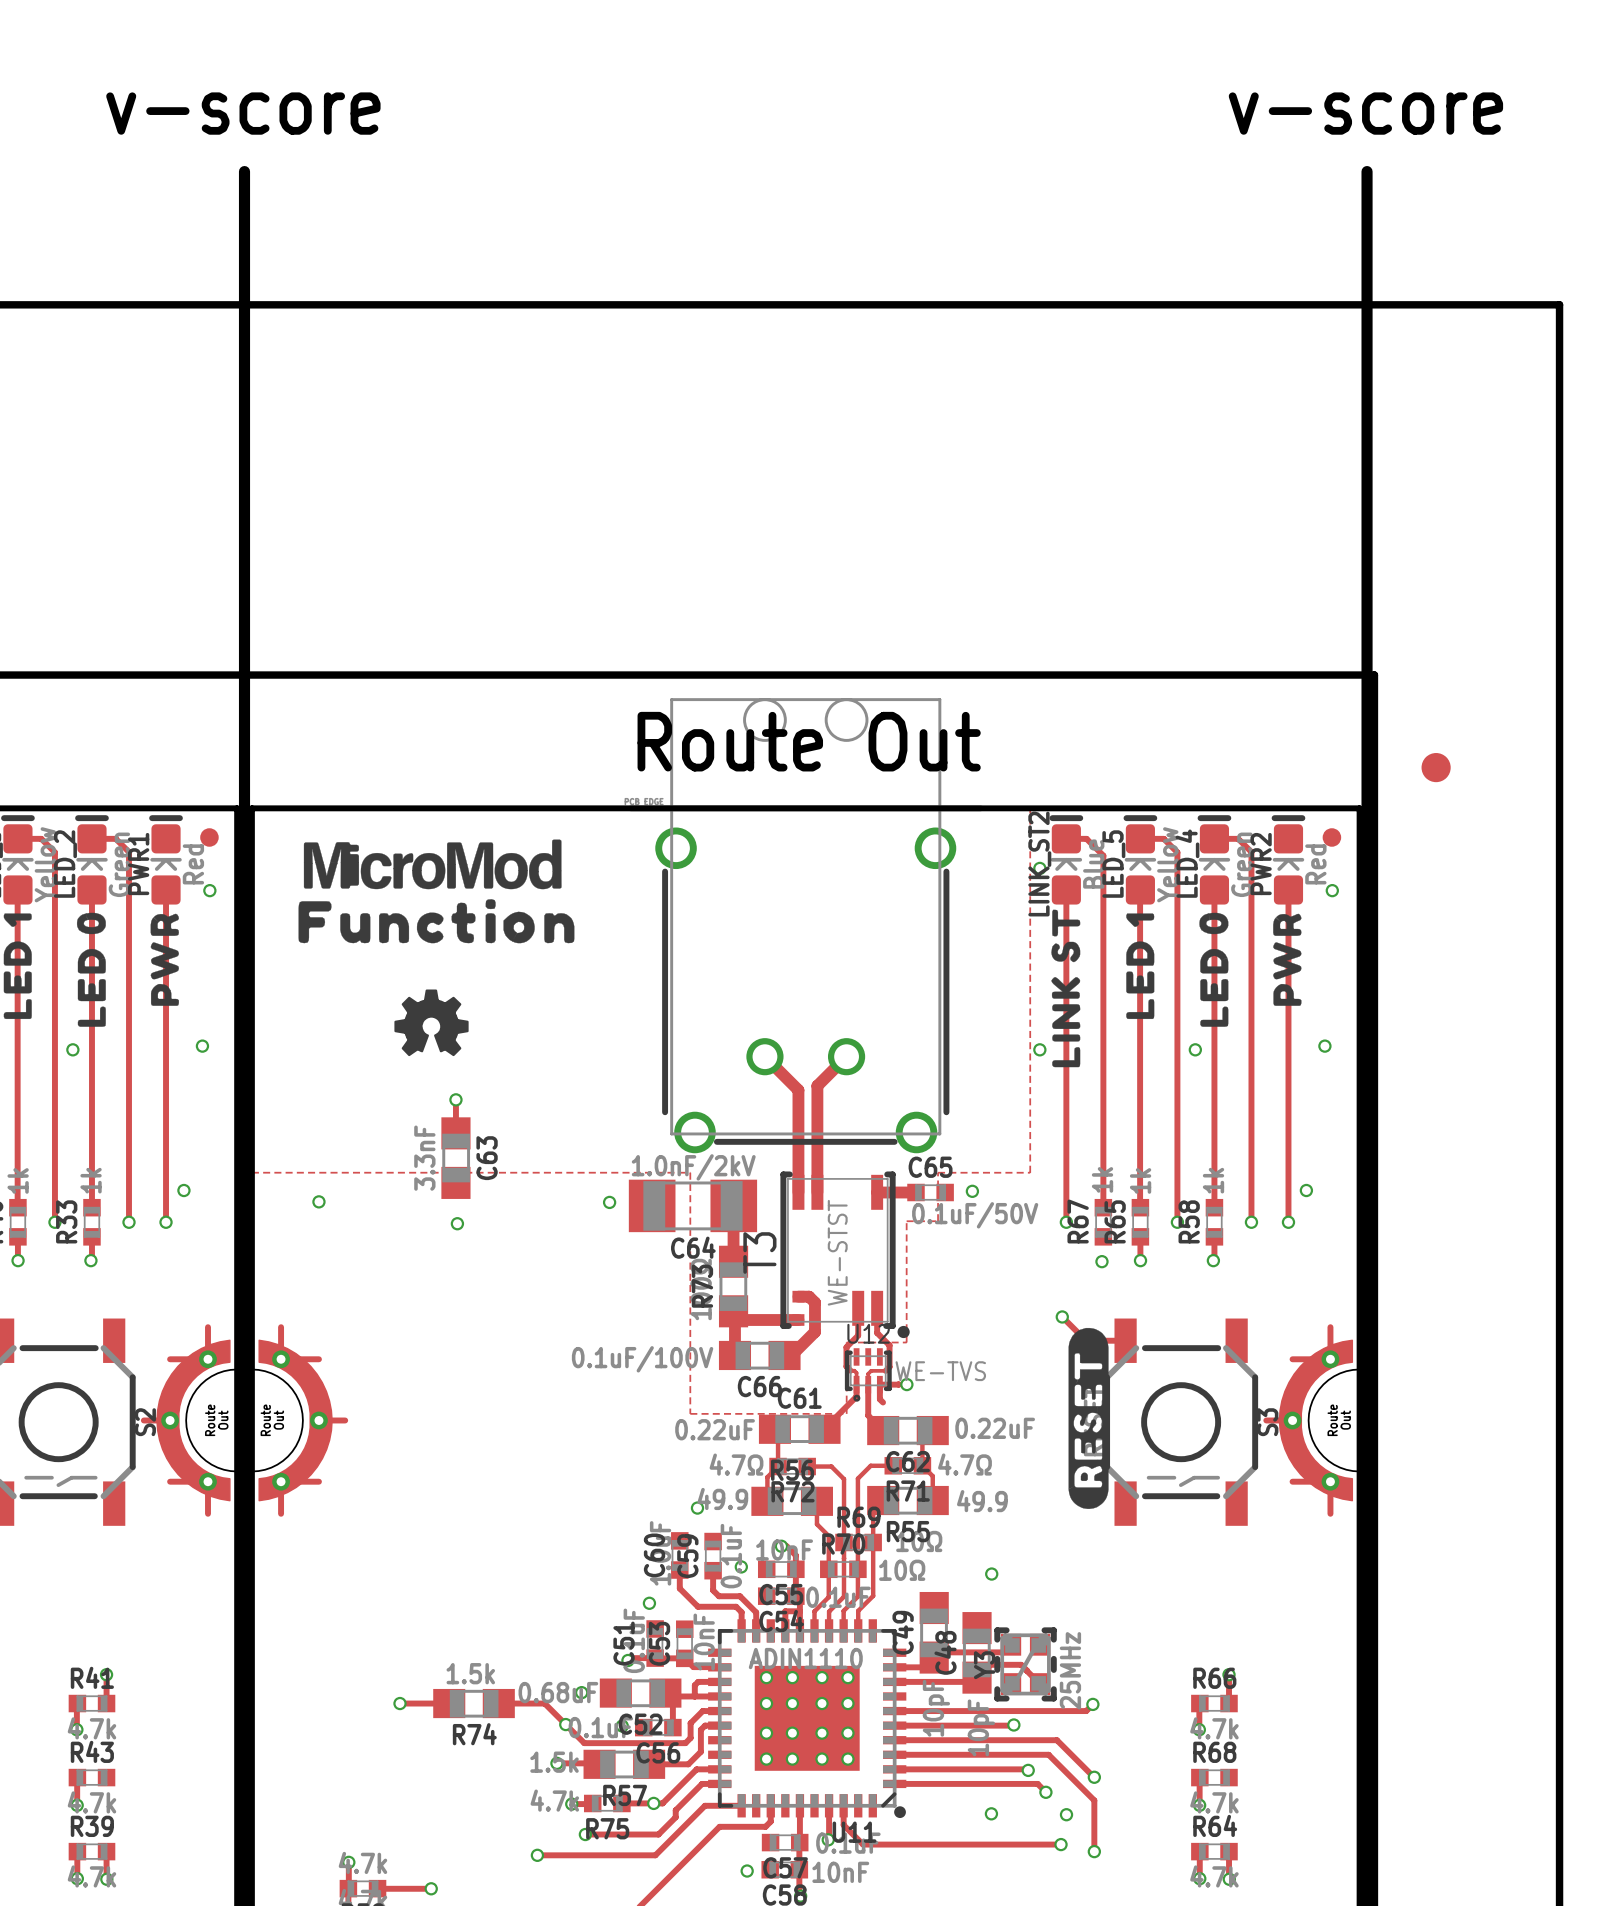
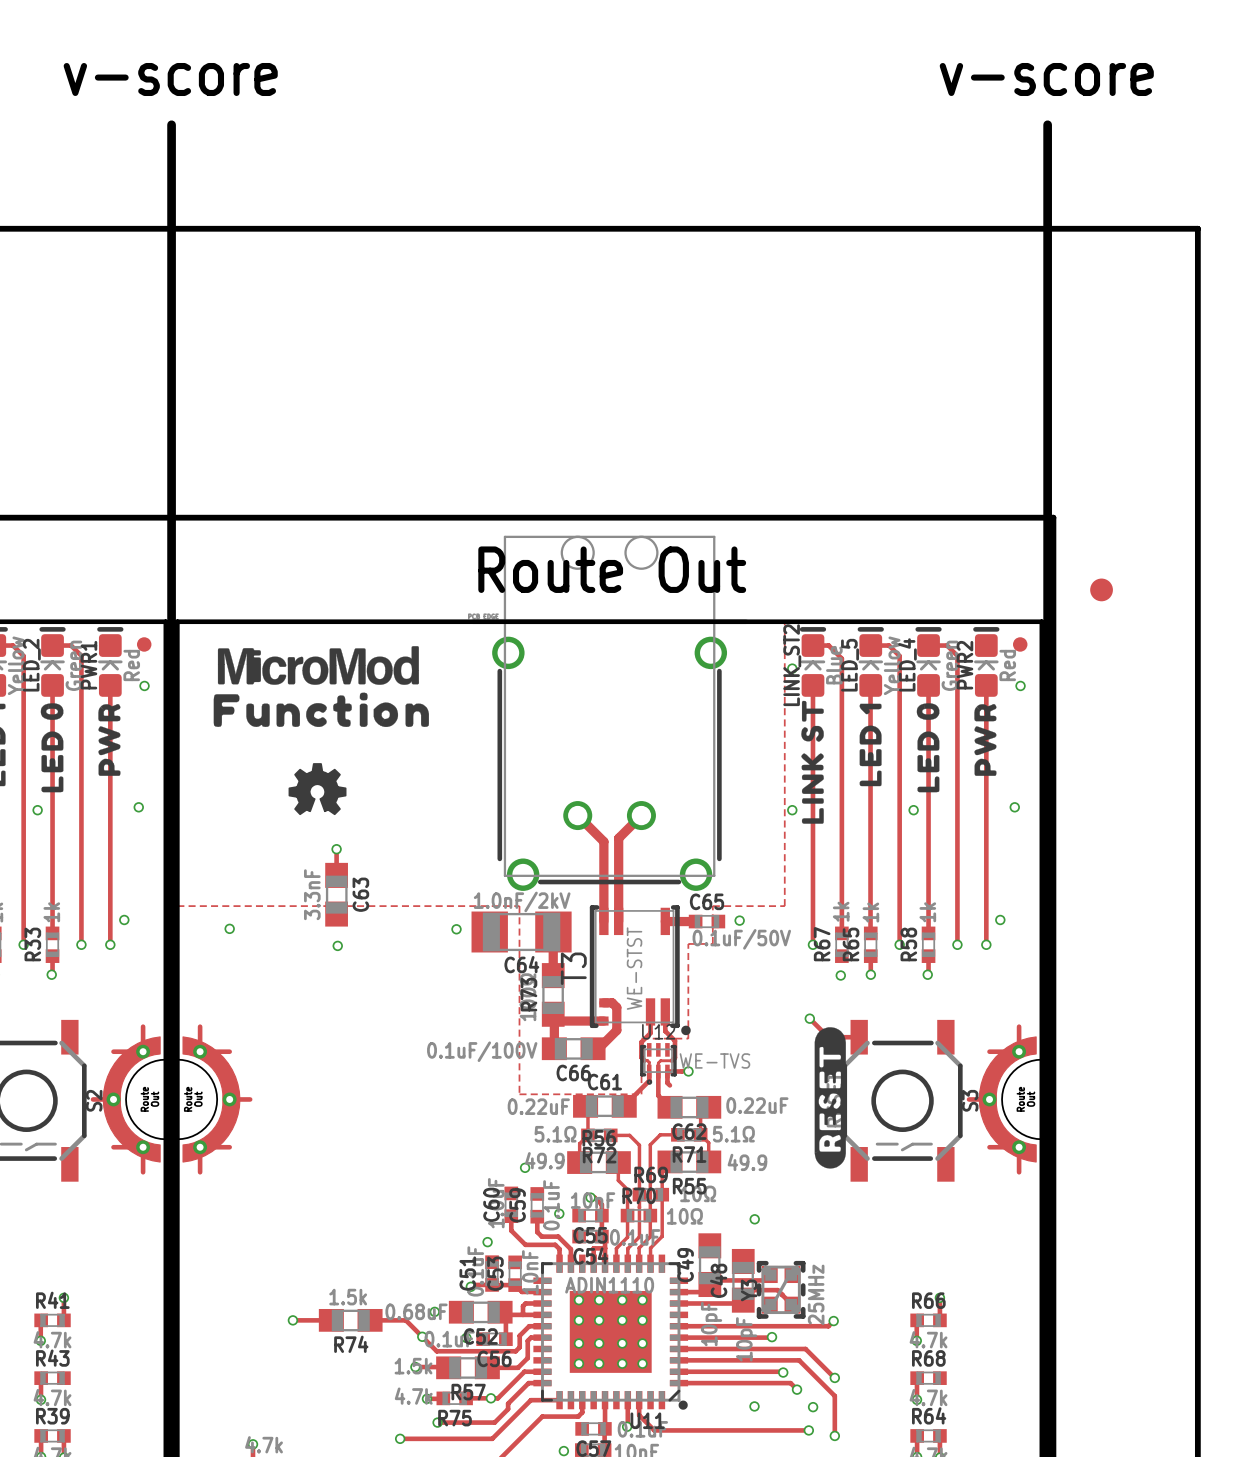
R72 value: 4.7Ω (736, 1464) -> 5.1Ω (555, 1134)
R71 value: 4.7Ω (964, 1464) -> 5.1Ω (733, 1134)

